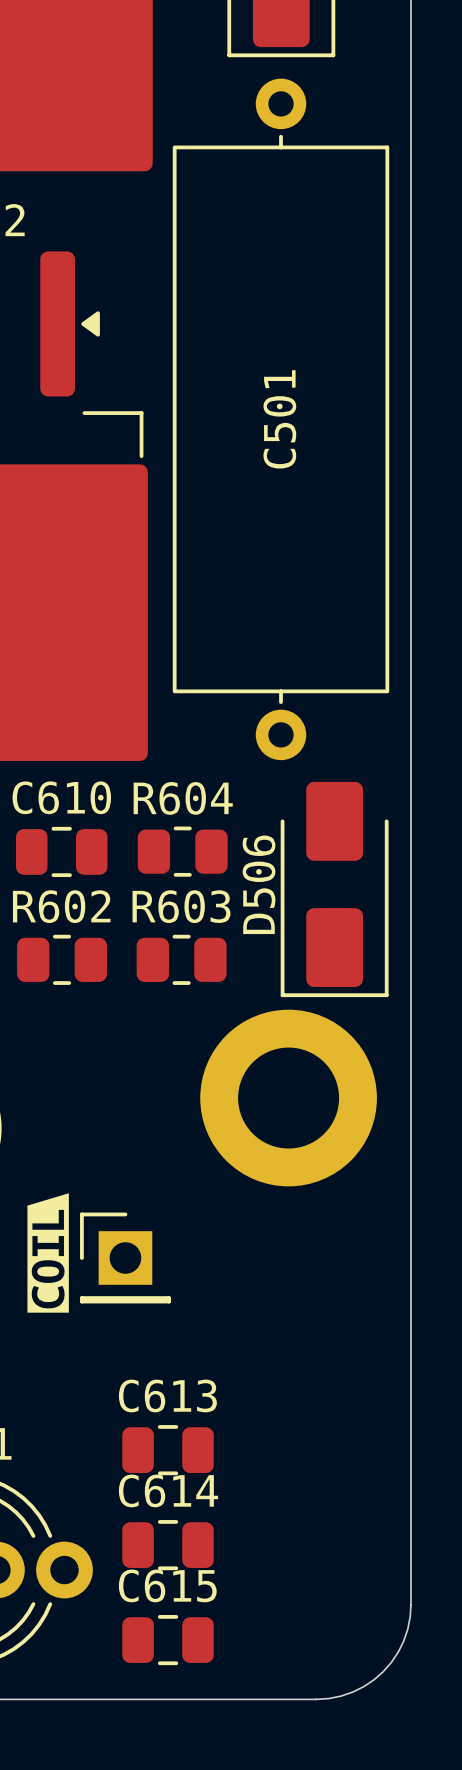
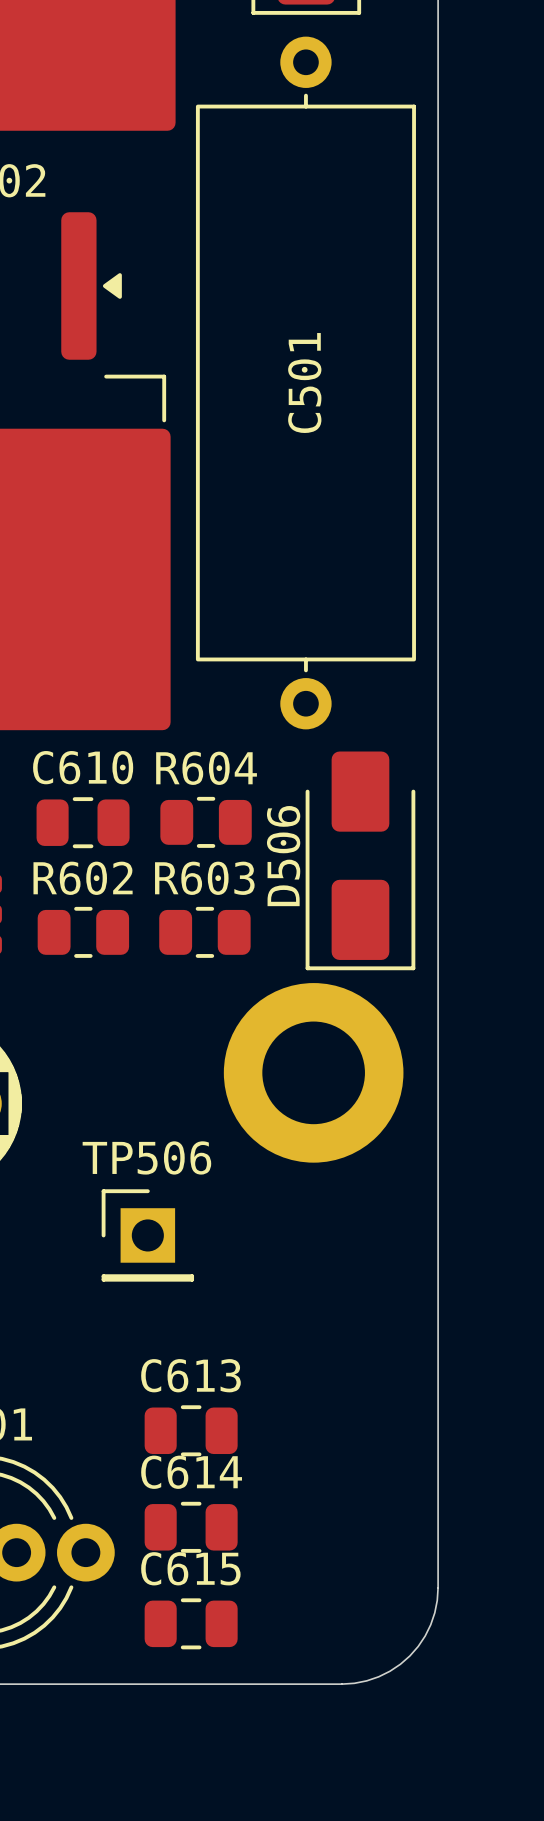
TP506 name: none -> TP506 (146, 1157)
drawing: [27, 1193, 69, 1313] -> none

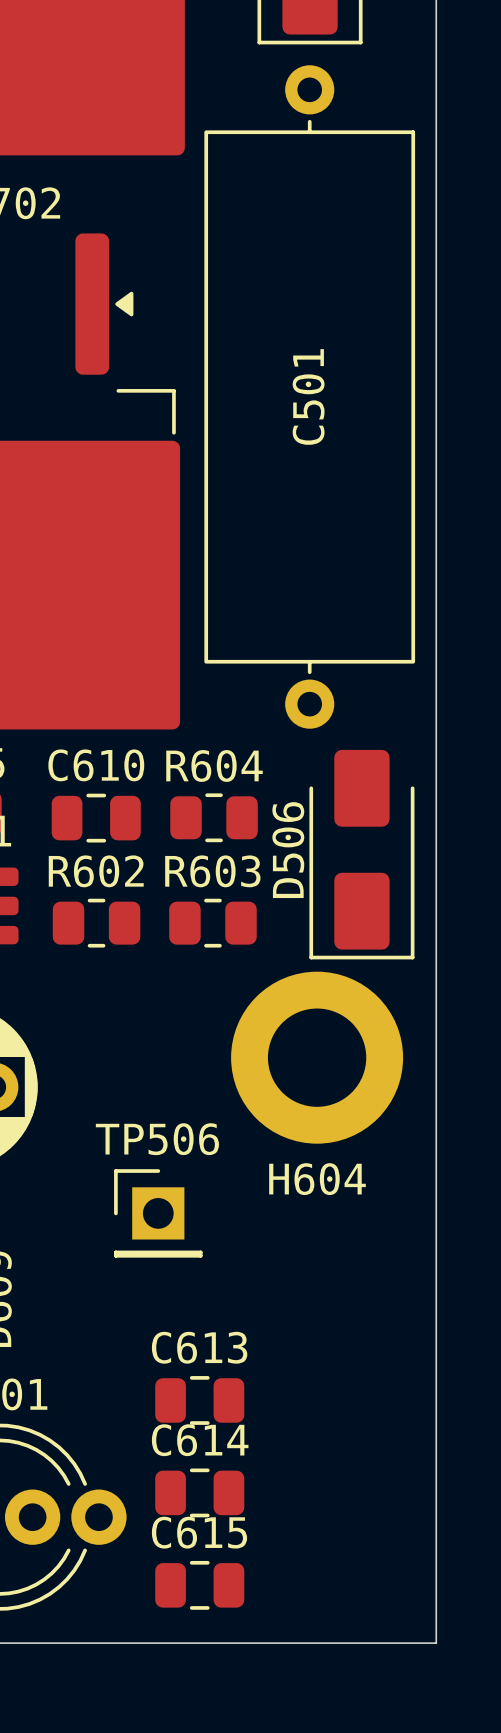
H604 name: none -> H604 (317, 1179)
board edge: (438, 1587) (434, 1612) (430, 1624) (425, 1636) (409, 1655) (389, 1671) (378, 1676) (366, 1680) (341, 1684) -> (436, 1550) (436, 1643) (344, 1643)

